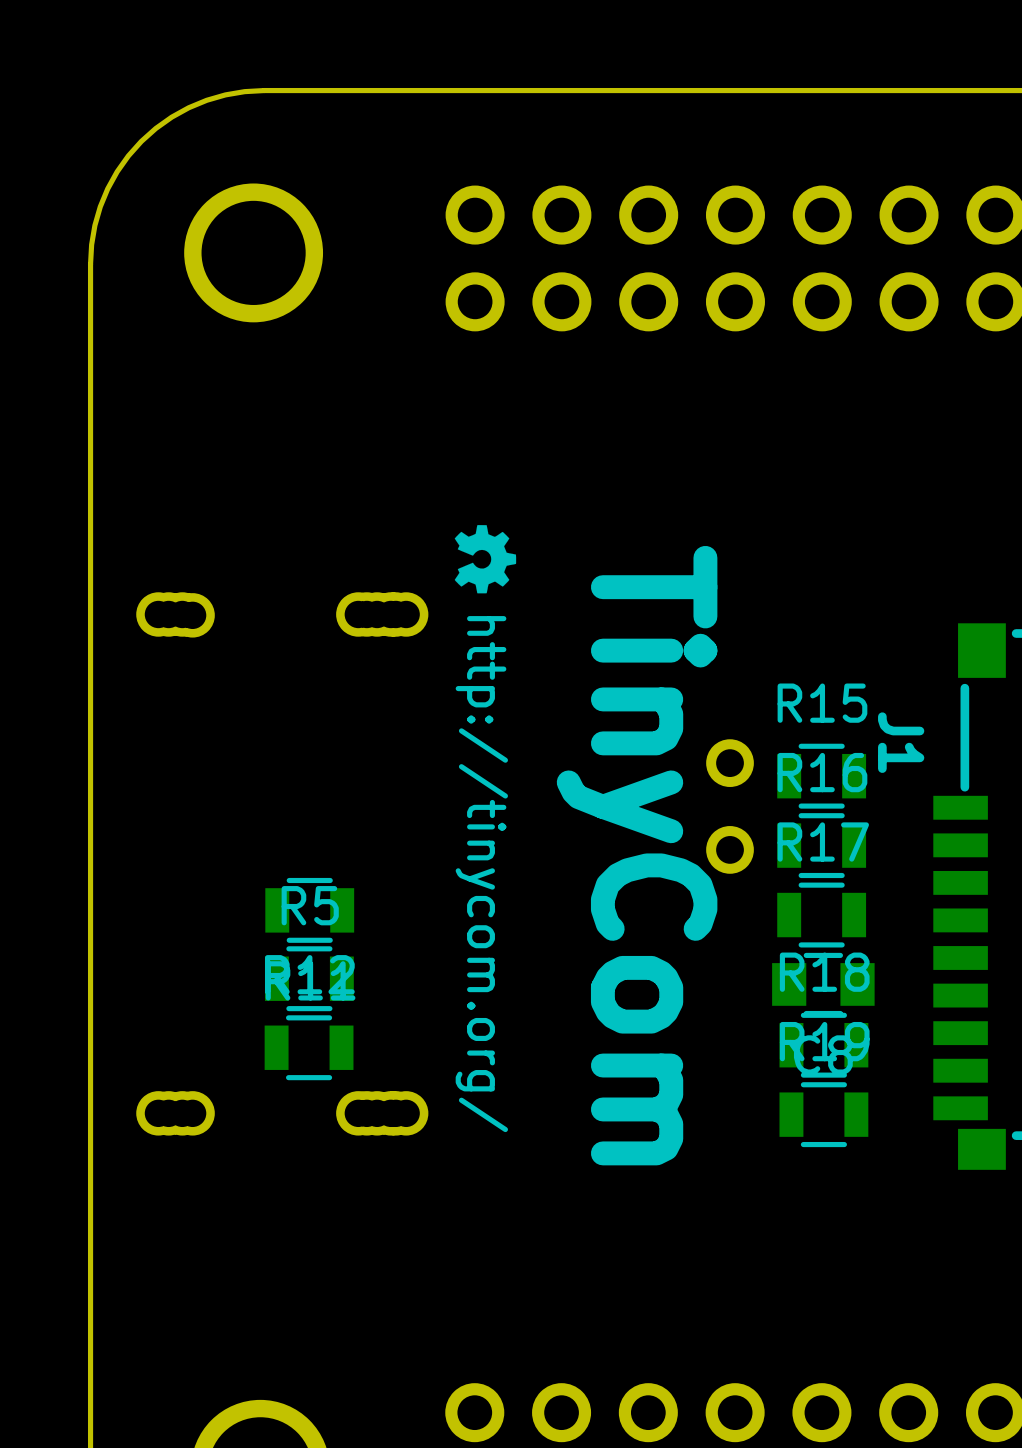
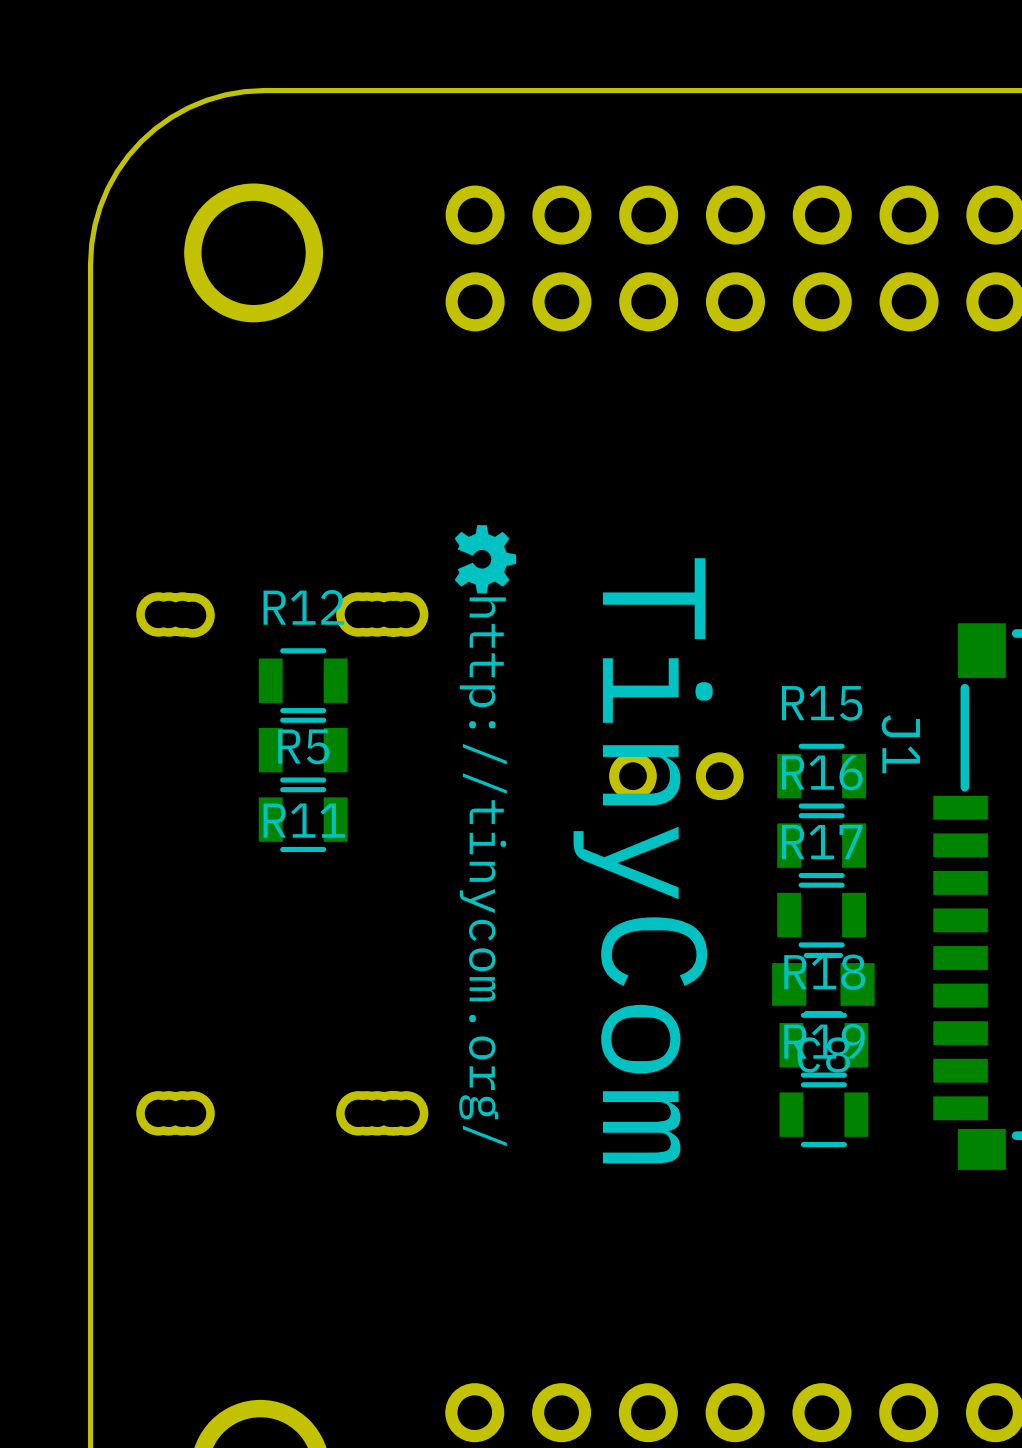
part rotation: 0° (730, 806) -> 90° clockwise (676, 776)
R11 position: (309, 910) -> (303, 750)
R5 position: (309, 978) -> (303, 819)
R12 position: (309, 1047) -> (303, 680)

